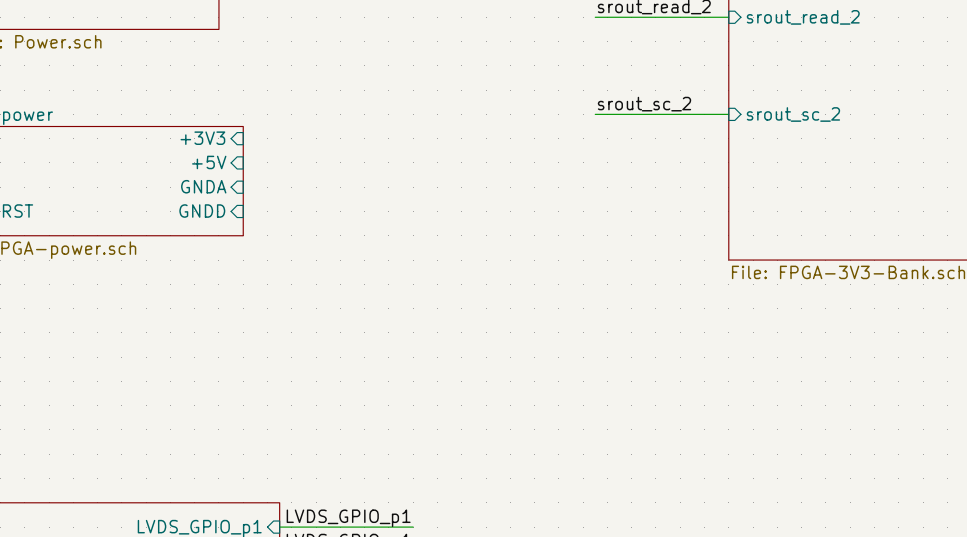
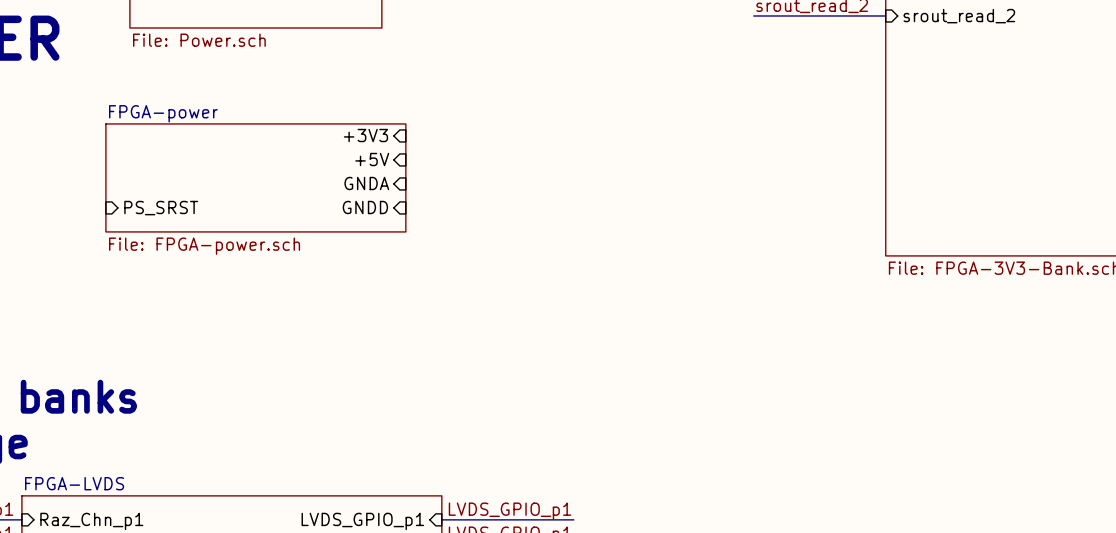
label: srout_sc_2 (644, 104) -> none
wire: (595, 114) (728, 114) -> none
sheet pin: srout_sc_2 (793, 114) -> none

